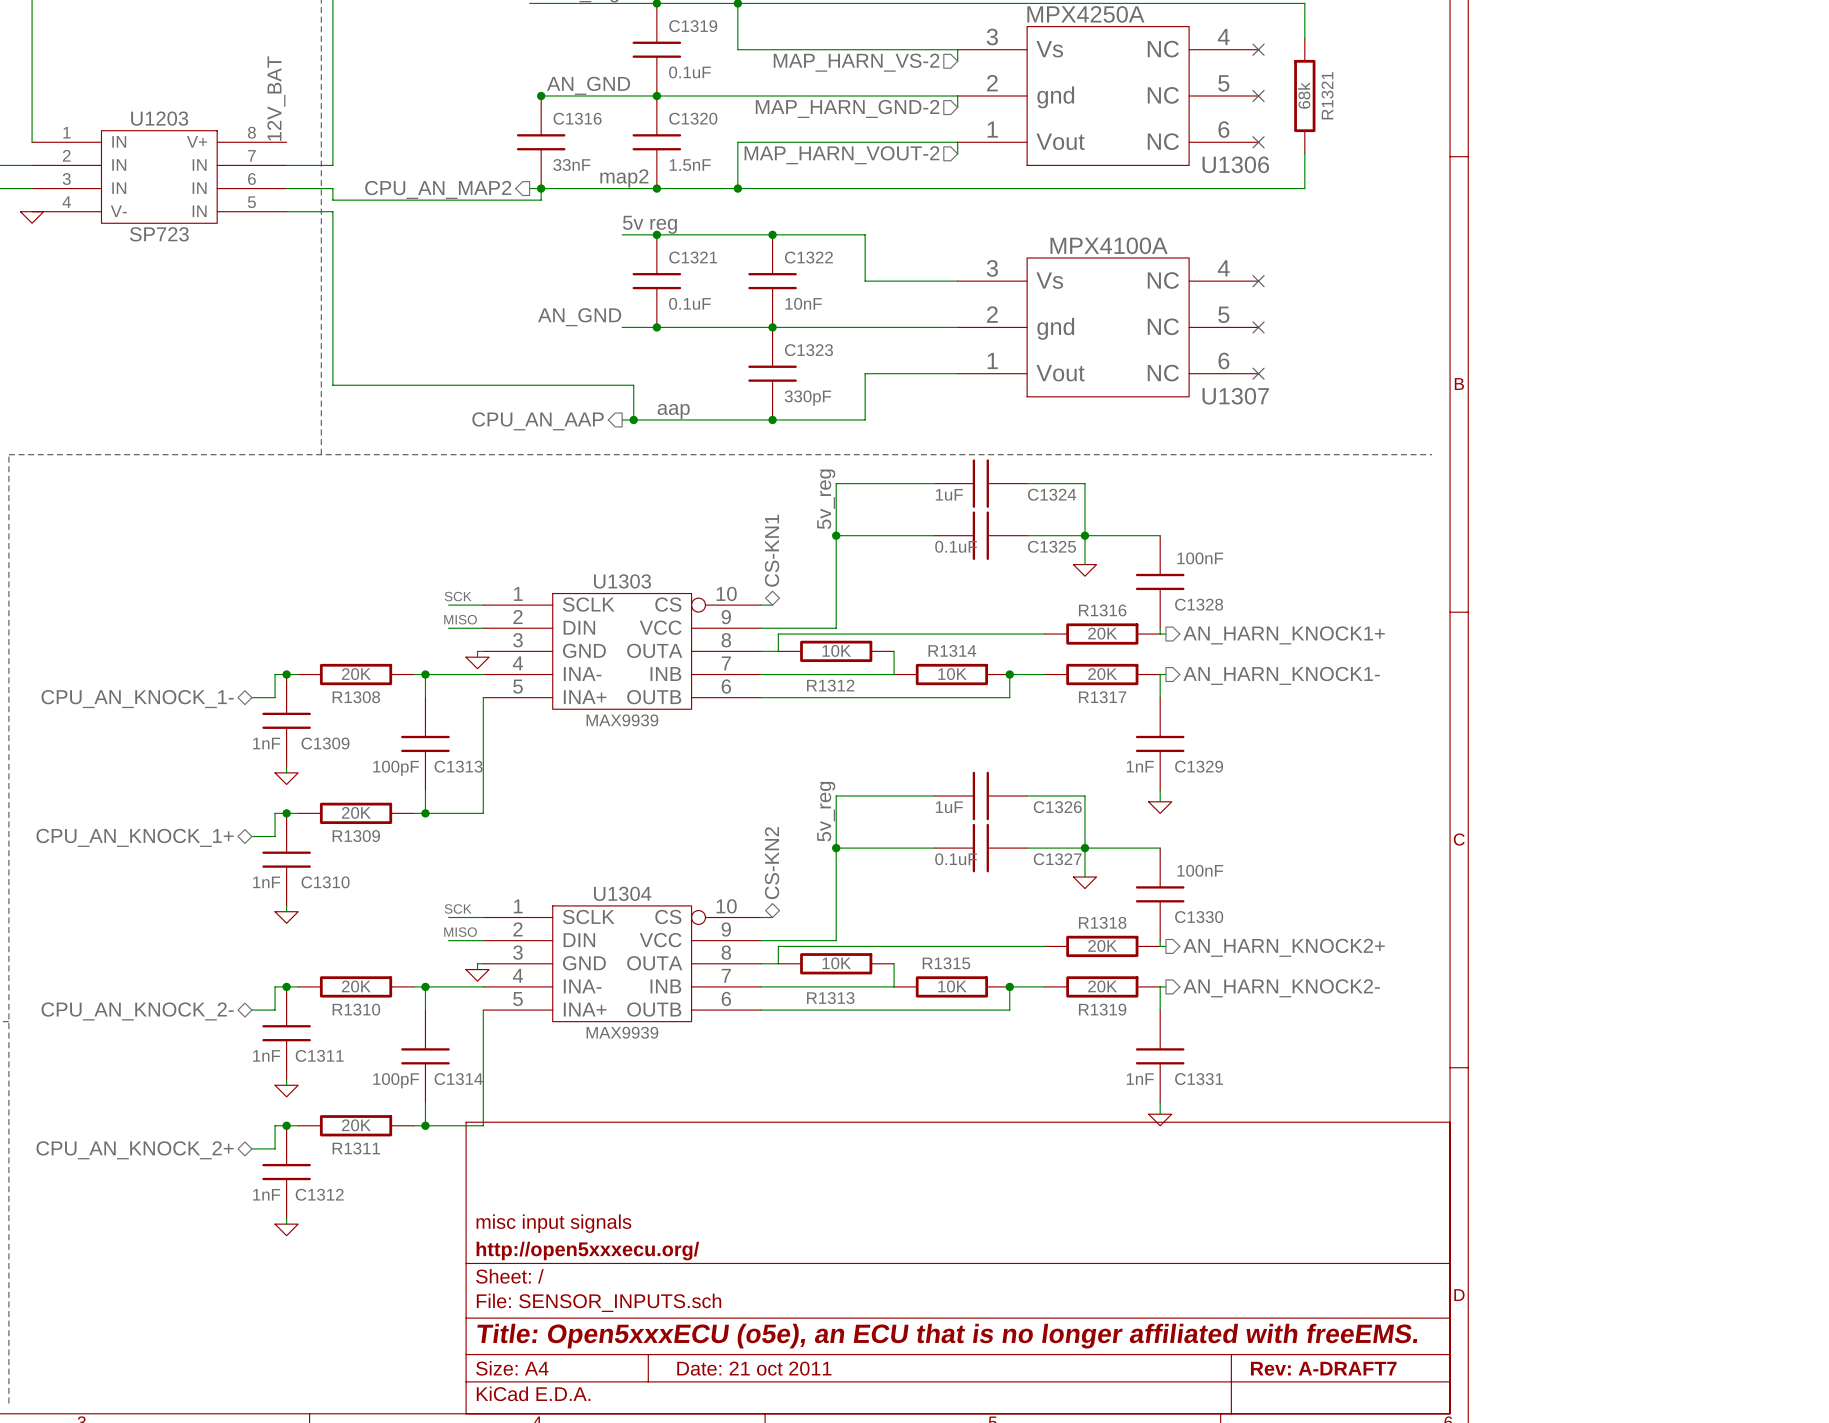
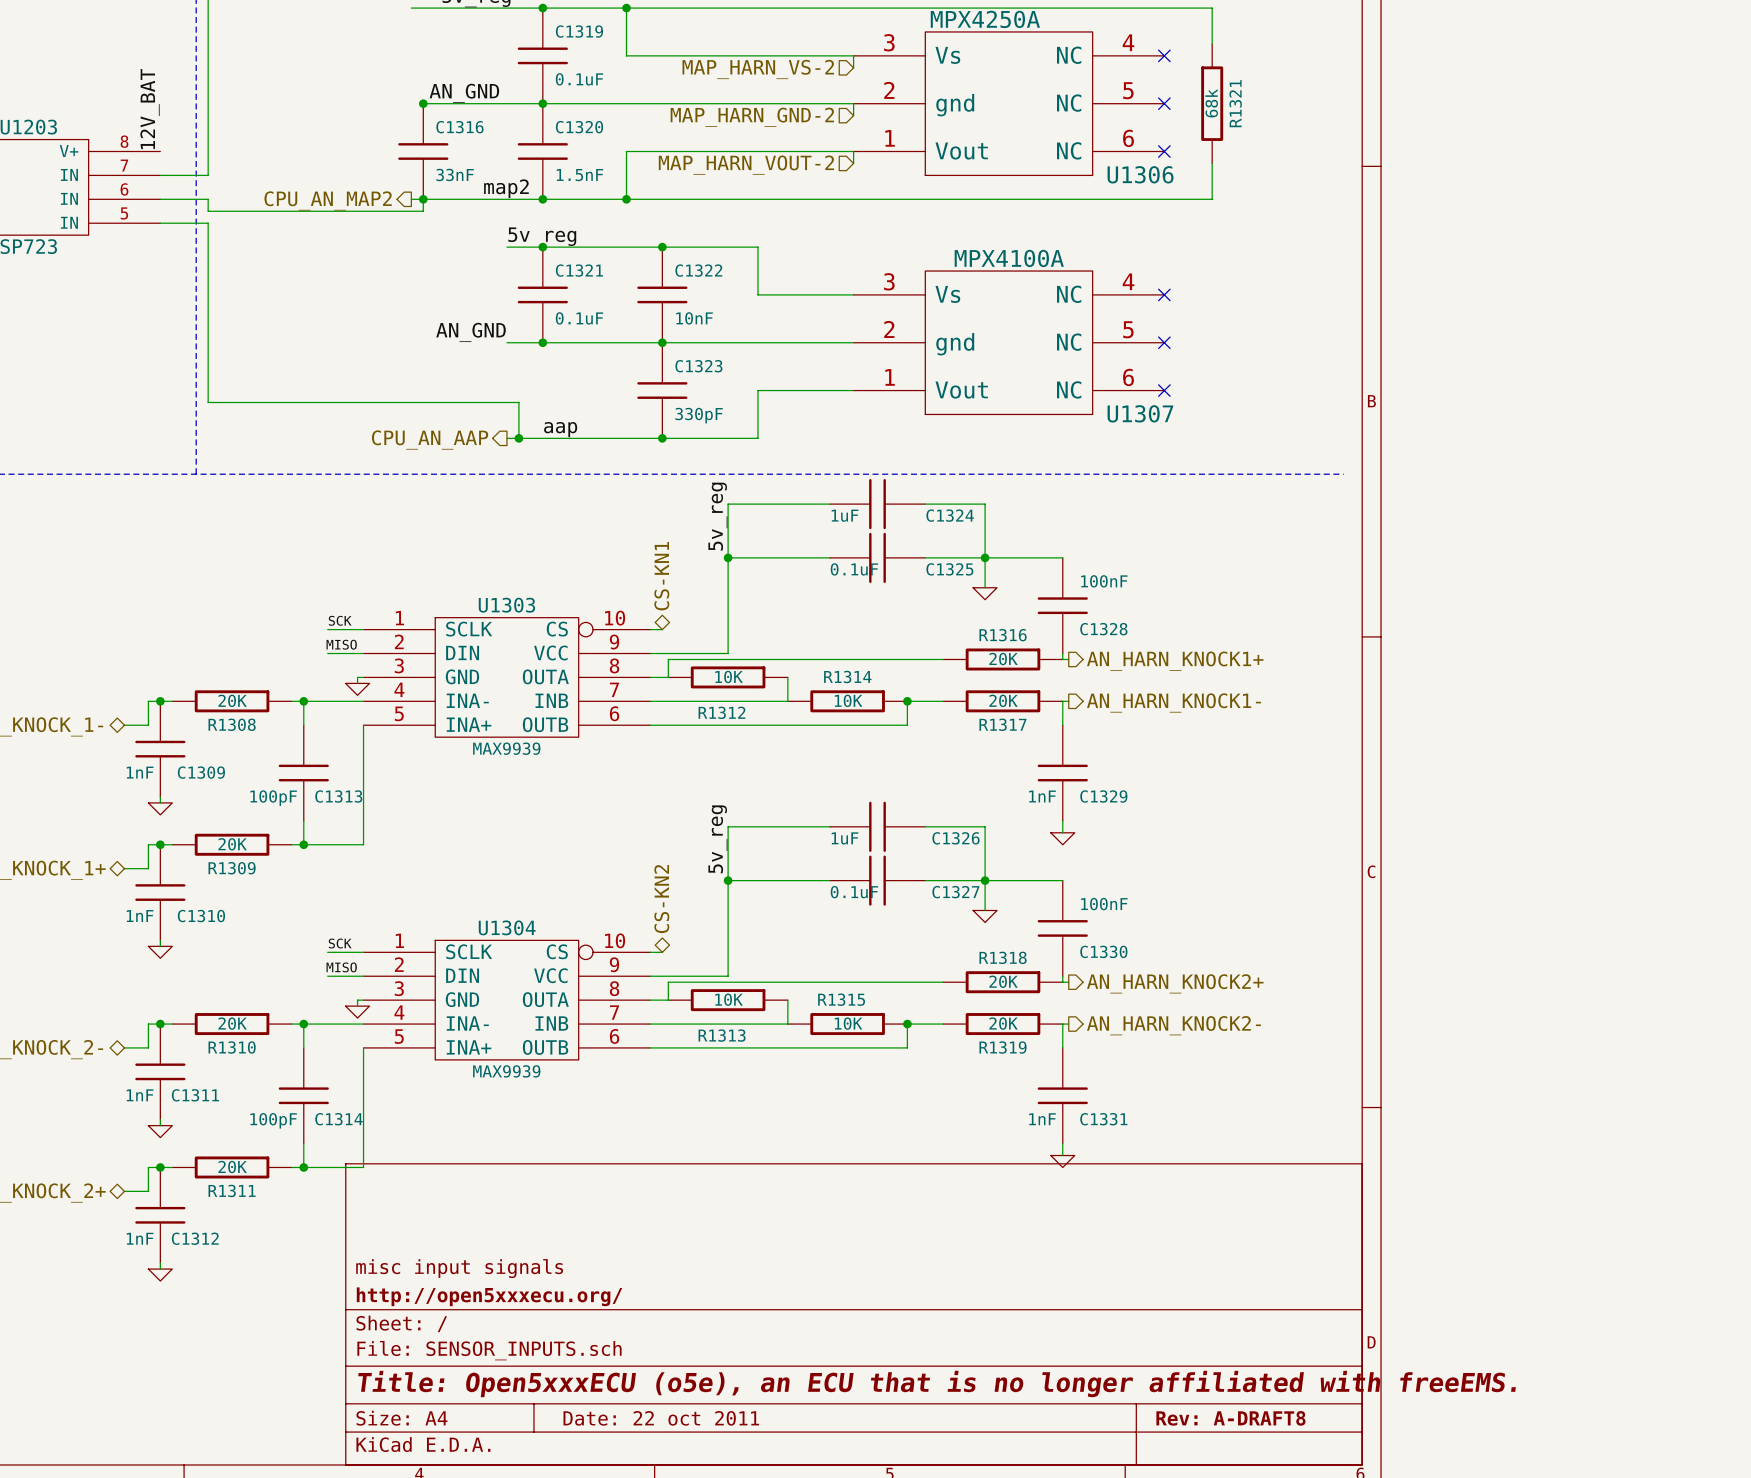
title block: Date: 21 oct 2011 (754, 1368) -> Date: 22 oct 2011 (661, 1418)
title block: Rev: A-DRAFT7 (1323, 1368) -> Rev: A-DRAFT8 (1230, 1418)

